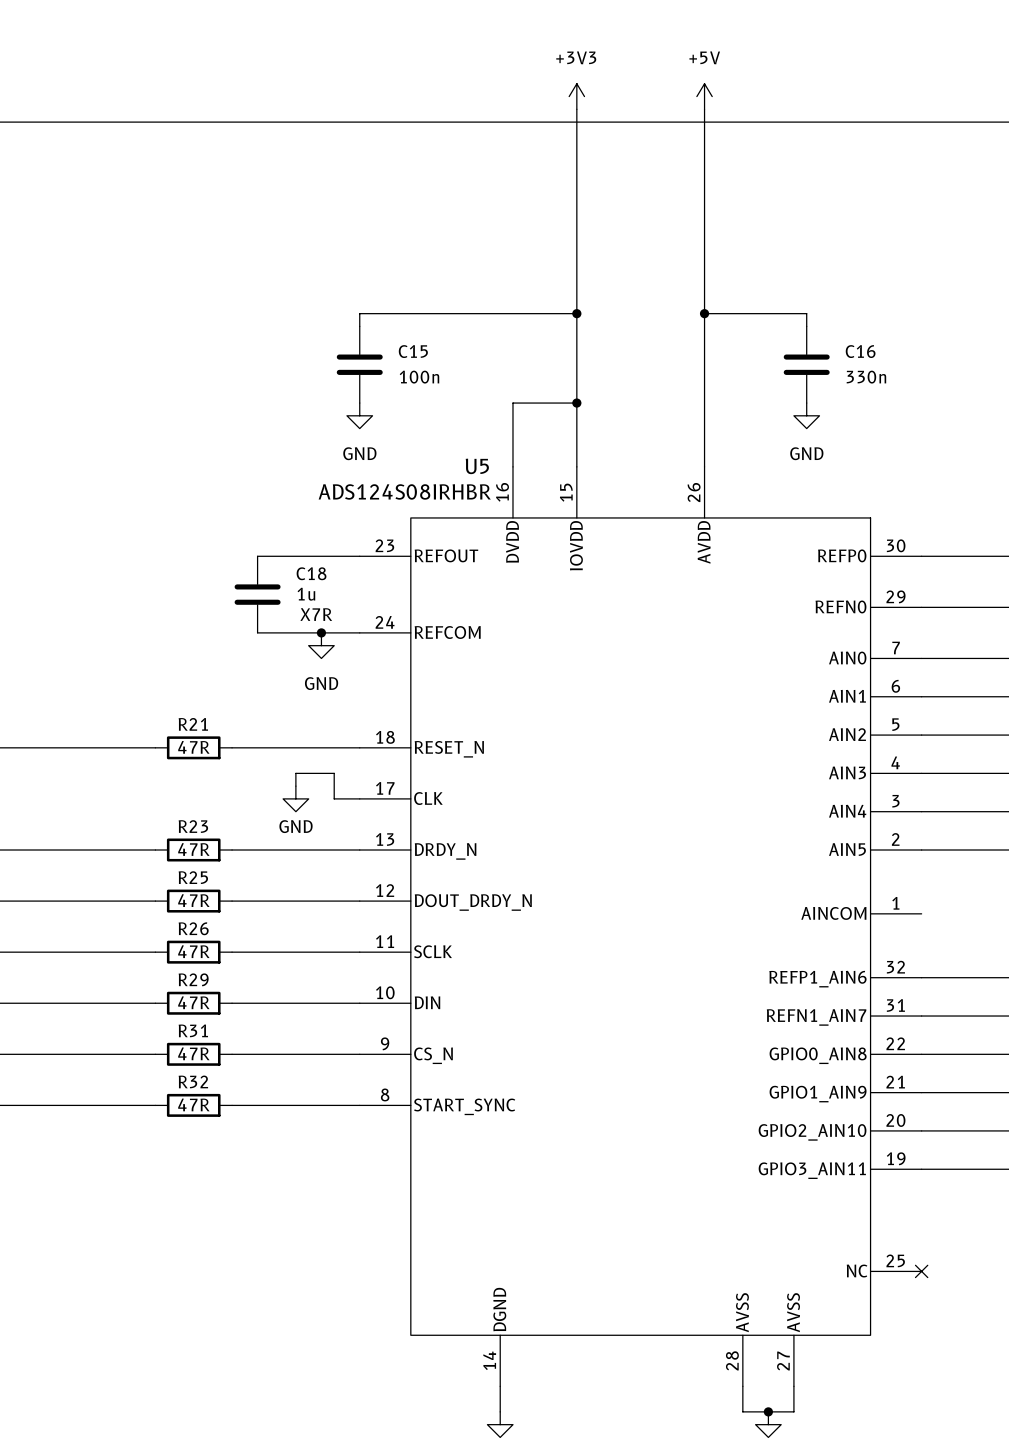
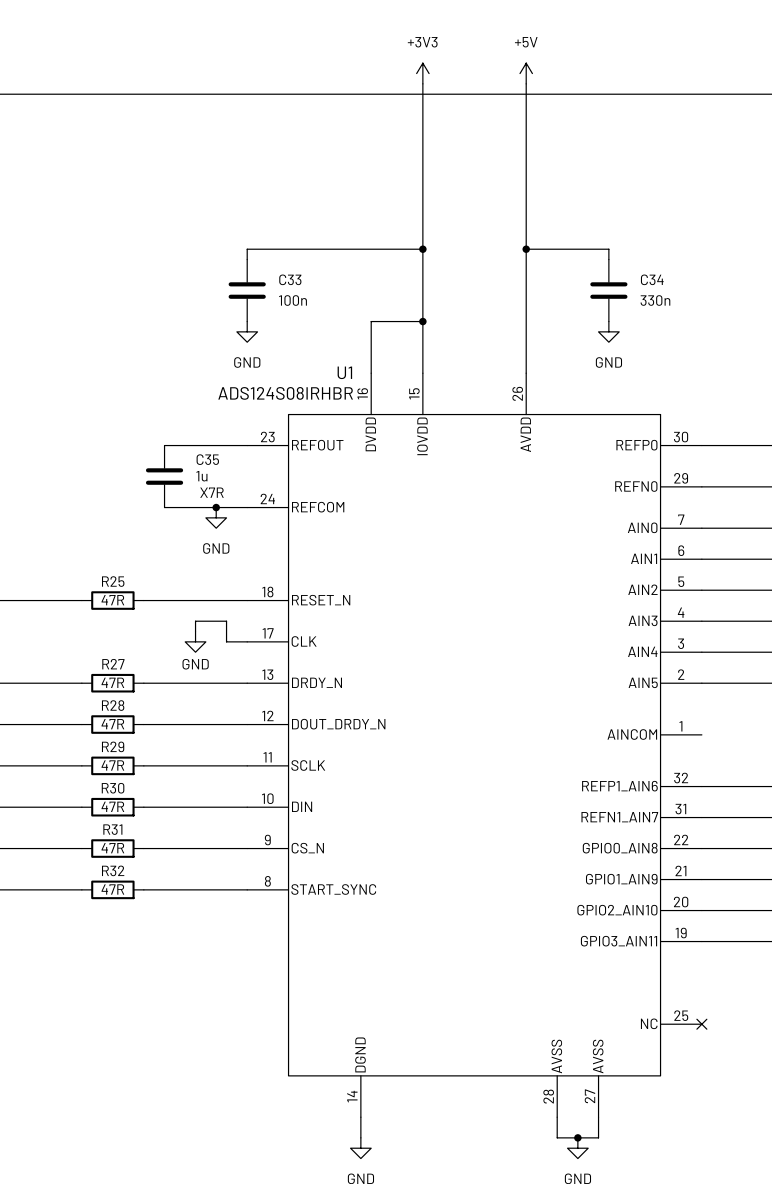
C15 name: C15 (413, 351) -> C33 (290, 279)
C16 name: C16 (860, 351) -> C34 (652, 279)
U5 name: U5 (477, 466) -> U1 (344, 372)
C18 name: C18 (311, 573) -> C35 (207, 459)
R21 name: R21 (193, 724) -> R25 (113, 581)
R23 name: R23 (193, 826) -> R27 (113, 664)
R25 name: R25 (193, 877) -> R28 (113, 705)
R26 name: R26 (193, 928) -> R29 (113, 746)
R29 name: R29 (193, 979) -> R30 (113, 788)

